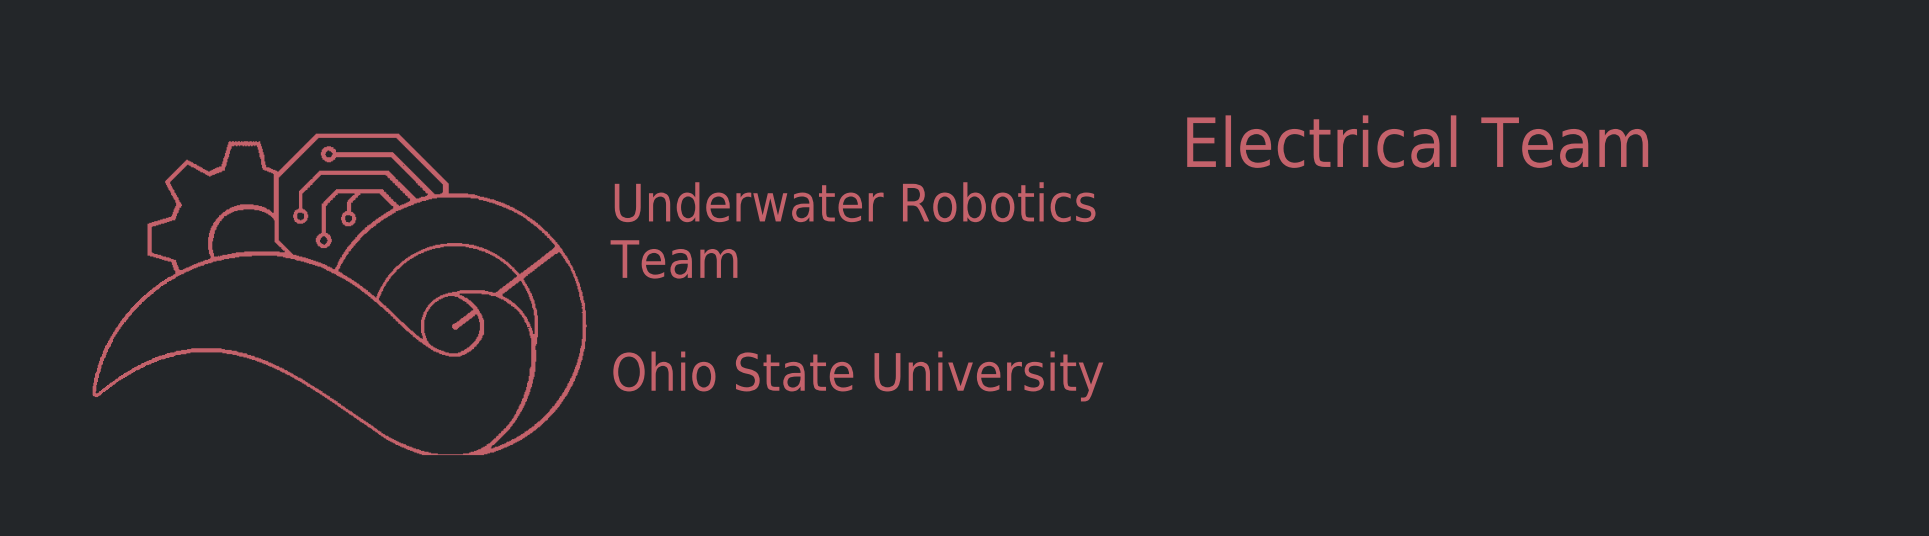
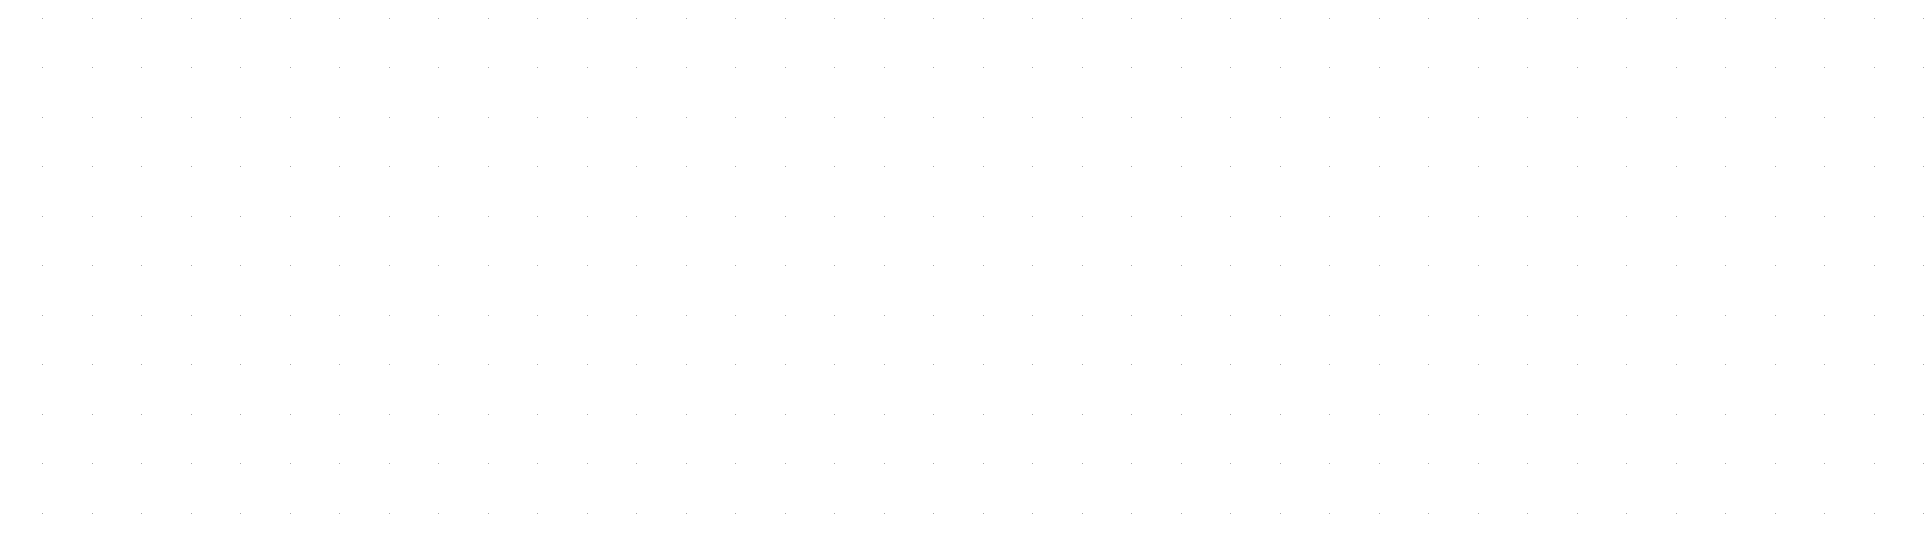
drawing: [92, 133, 587, 456] -> none
text: Electrical Team (1417, 141) -> none
text: Underwater Robotics (855, 202) -> none
text: Team (674, 259) -> none
text: Ohio State University (858, 376) -> none

